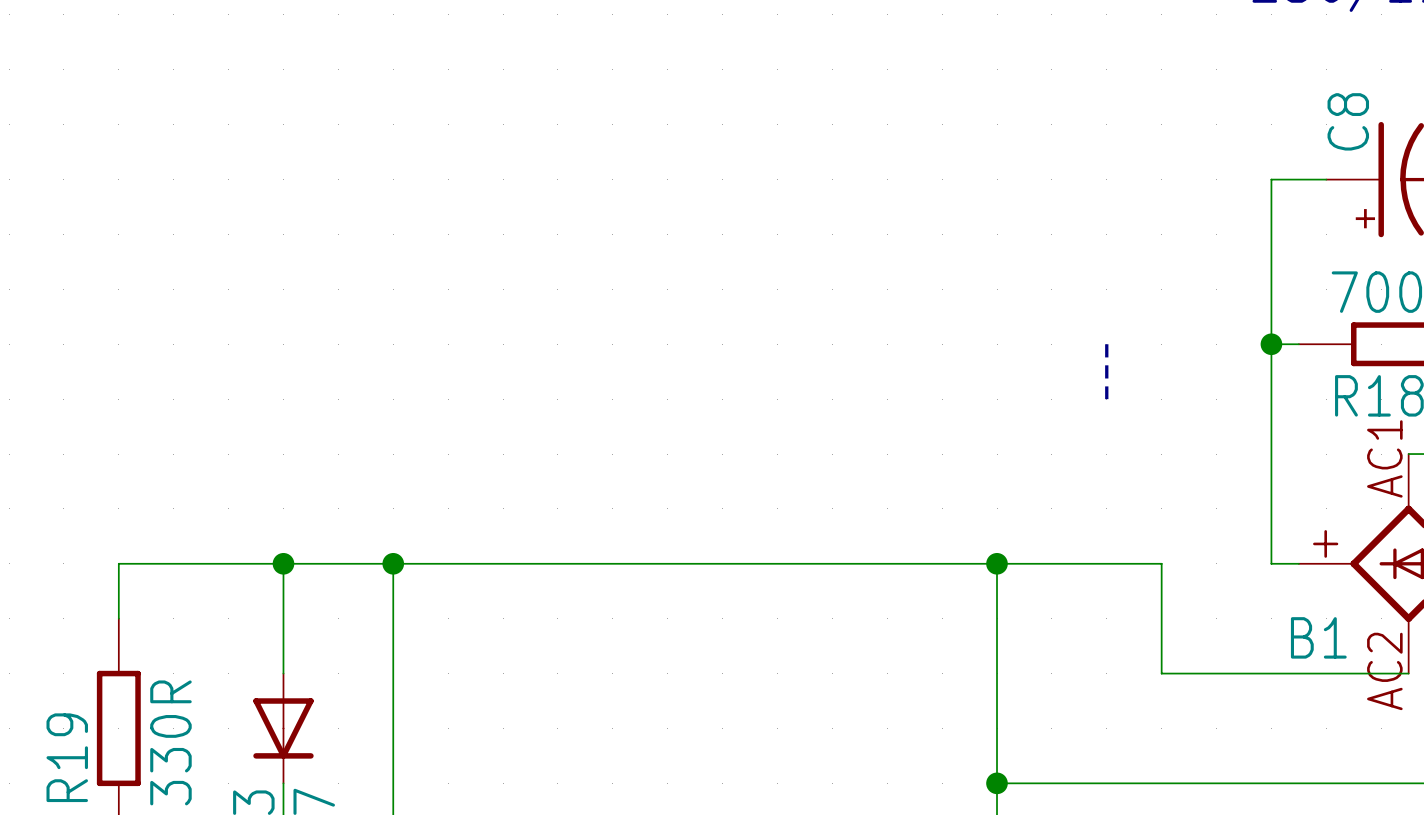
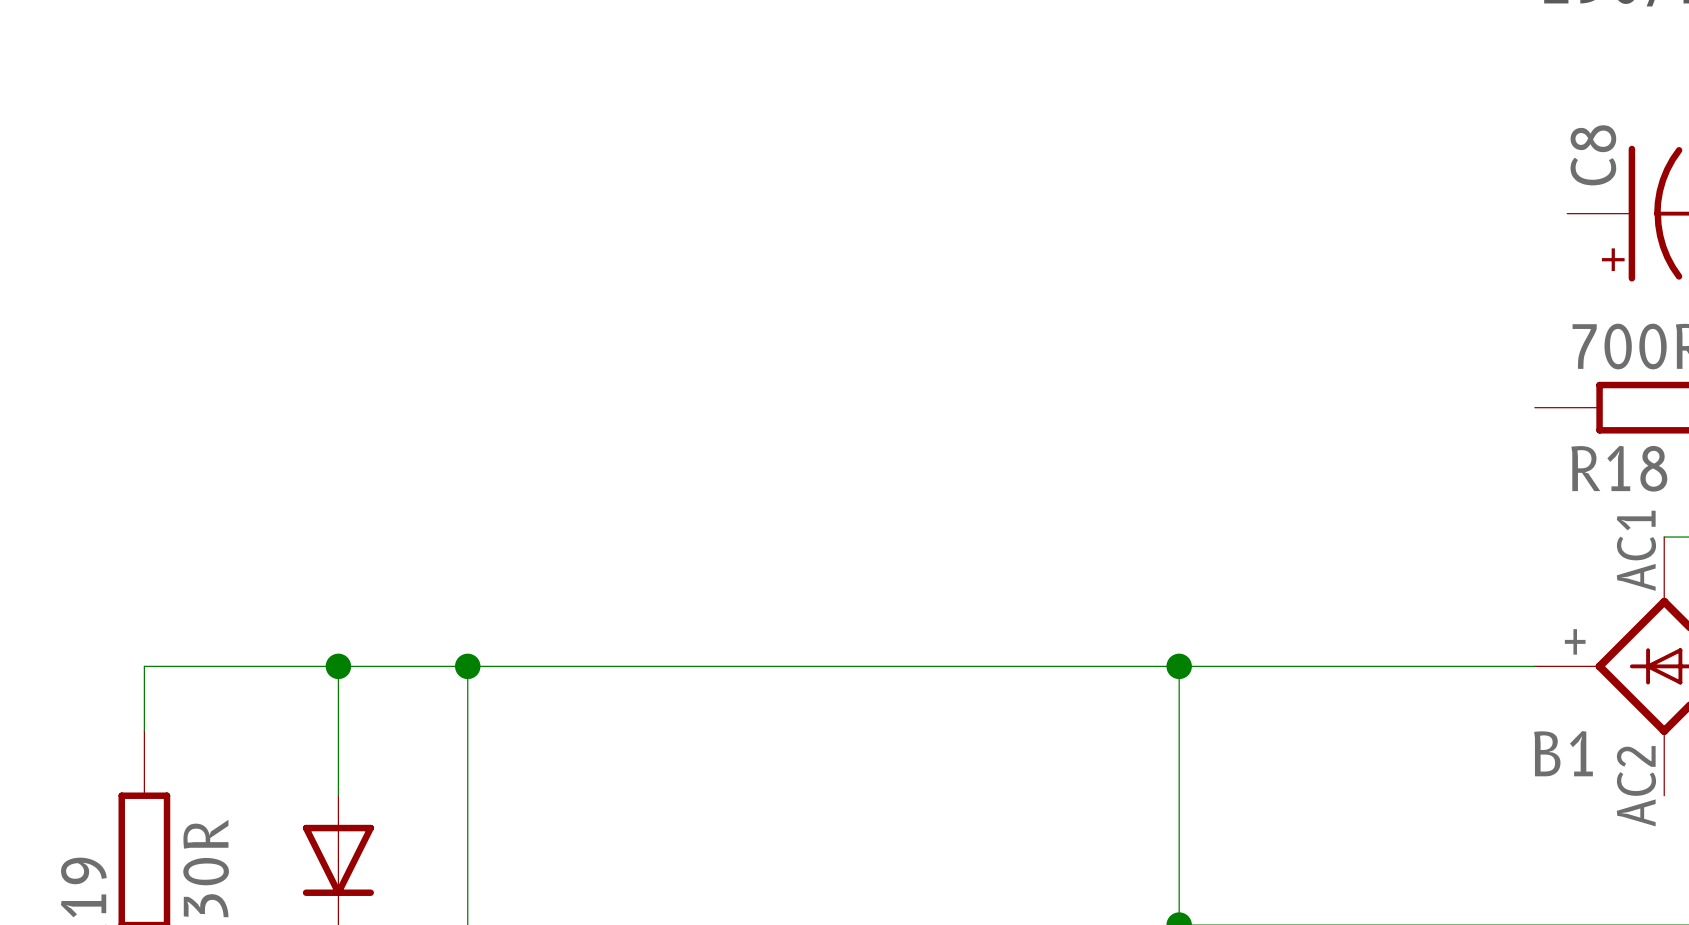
wire: (1326, 179) (1271, 179) (1271, 563) -> none
line: (1106, 344) (1106, 399) -> none
wire: (1271, 344) (1298, 344) -> none
junction: (1271, 344) -> none
wire: (1161, 563) (1161, 673) (1408, 673) -> (1373, 666) (1502, 666)

